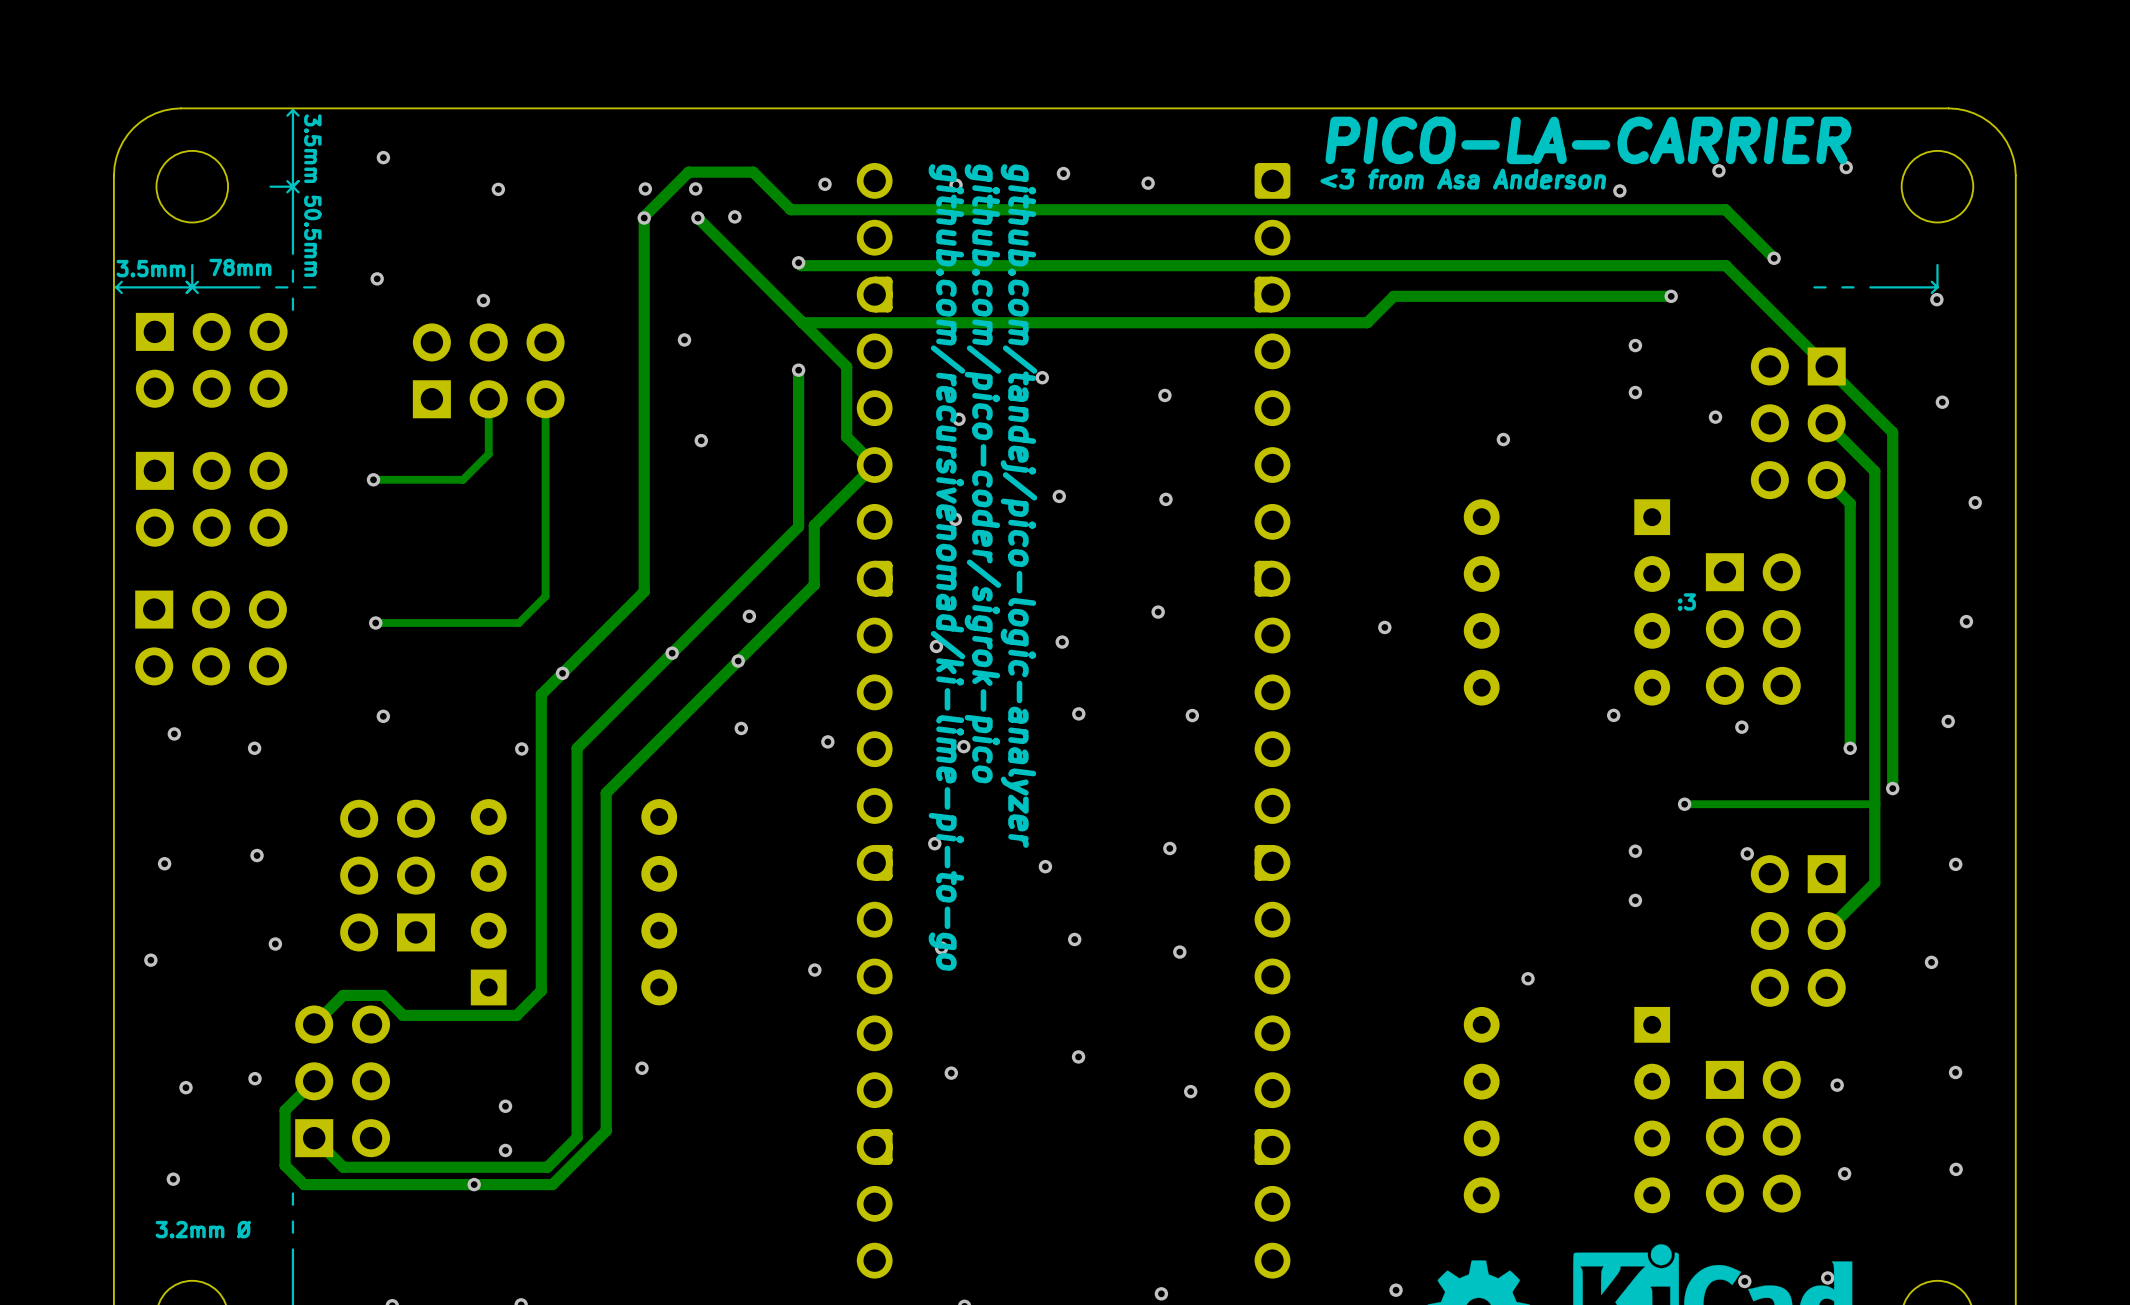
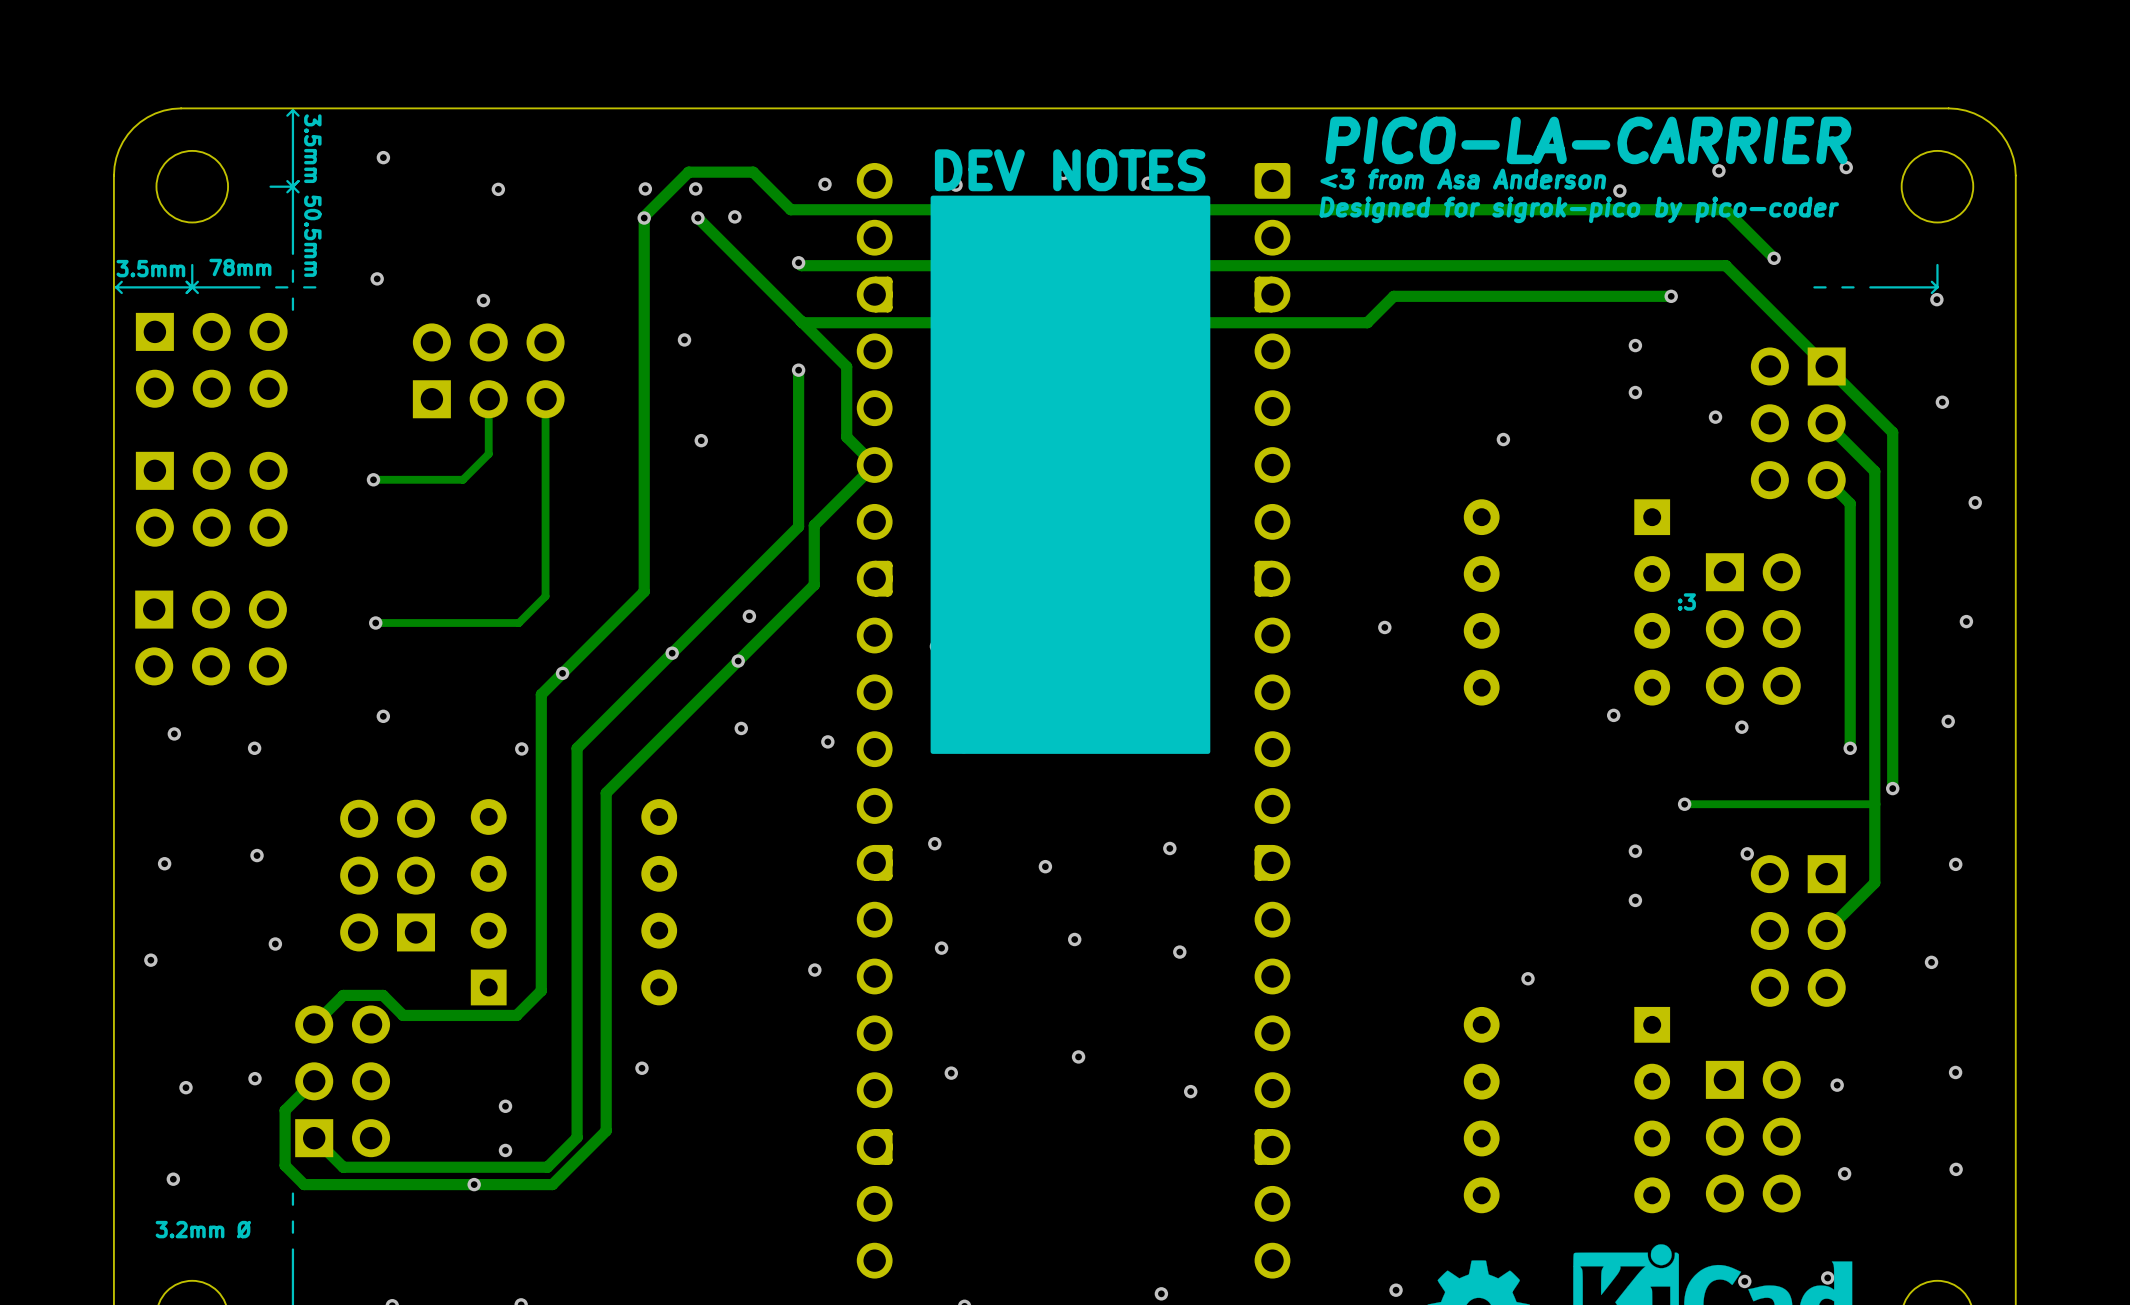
text: none -> DEV NOTES (1070, 170)
drawing: none -> [930, 195, 1211, 754]
text: none -> Designed for sigrok-pico by pico-coder (1579, 209)
text: github.com/pico-coder/sigrok-pico (982, 473) -> none
text: github.com/tandej/pico-logic-analyzer (1018, 506) -> none
text: github.com/recursivenomad/ki-lime-pi-to-go (946, 567) -> none

